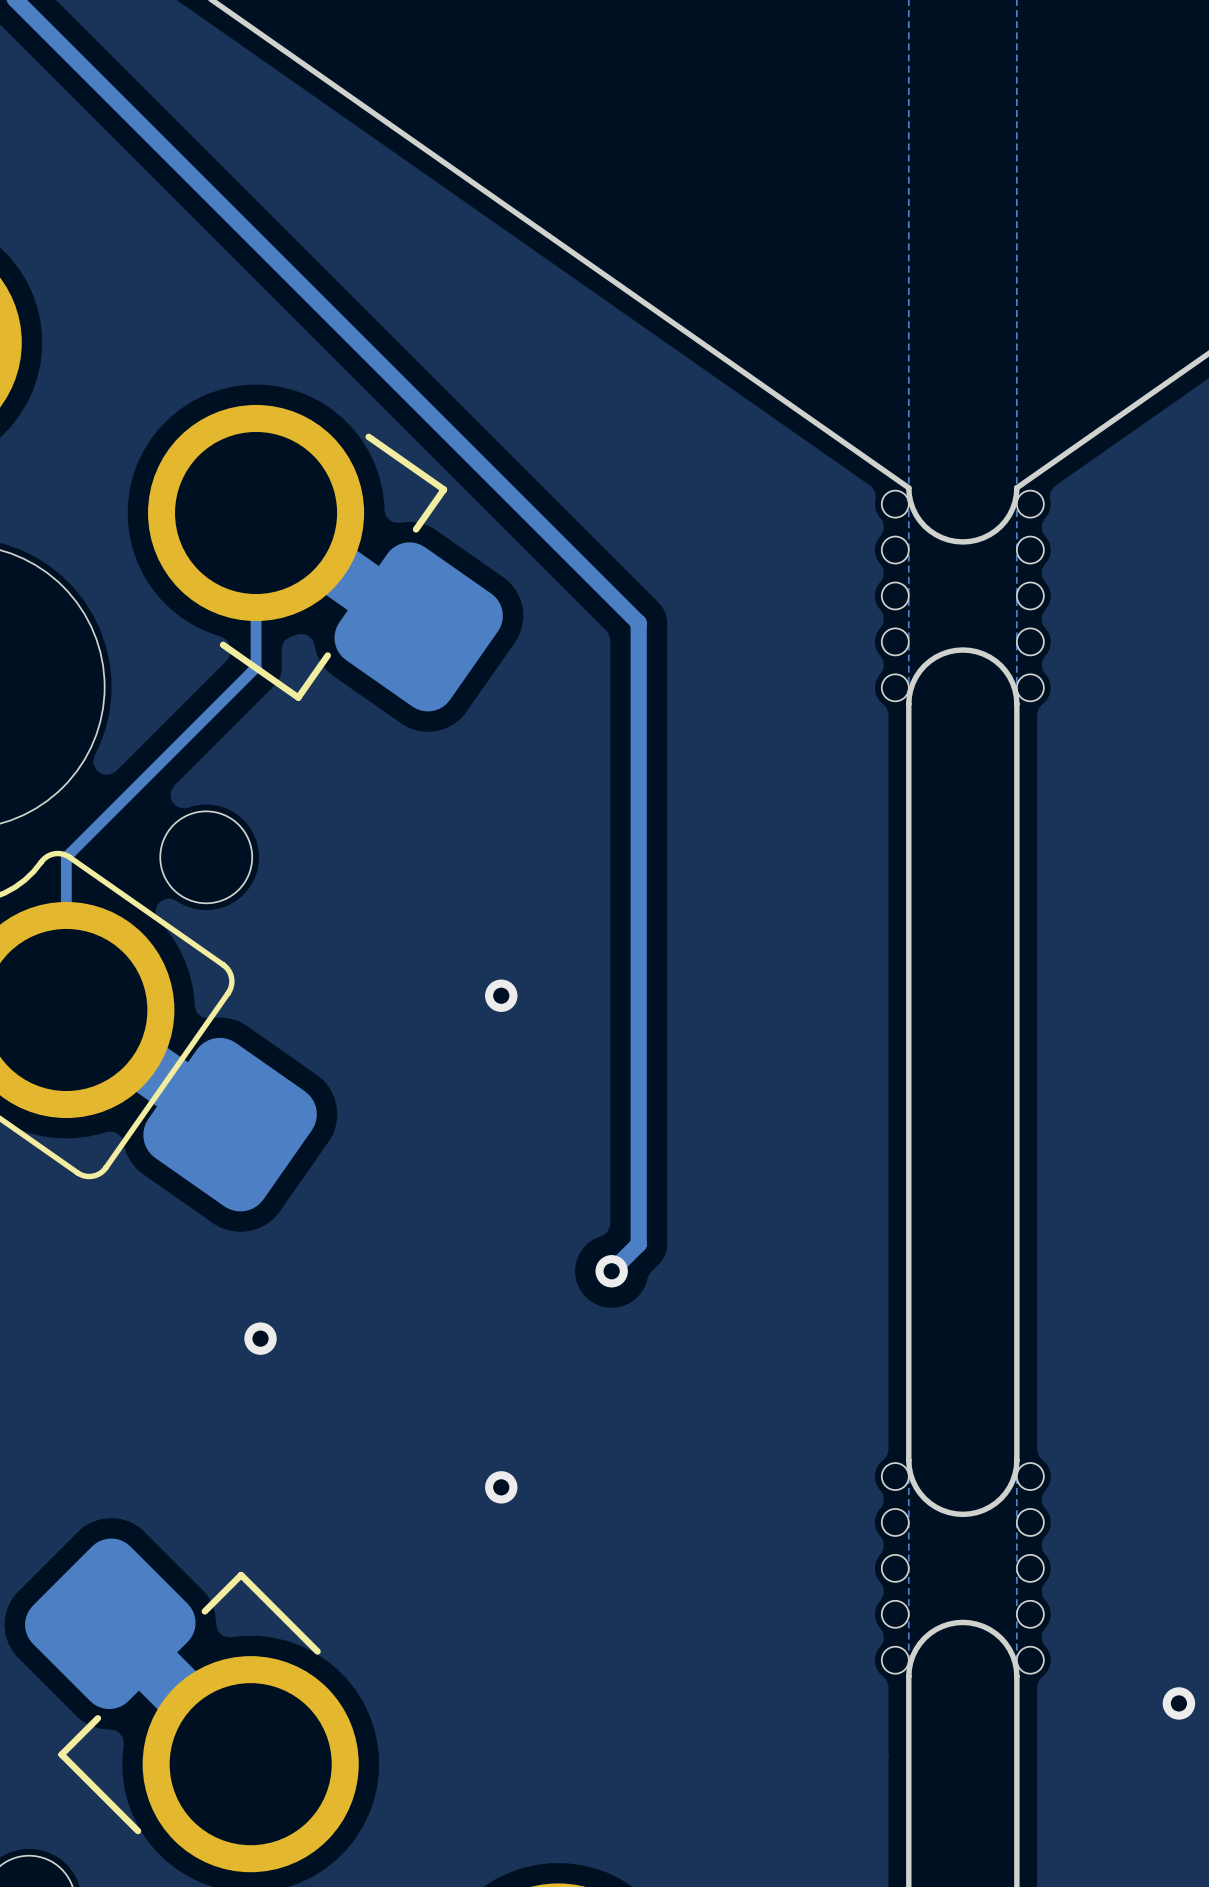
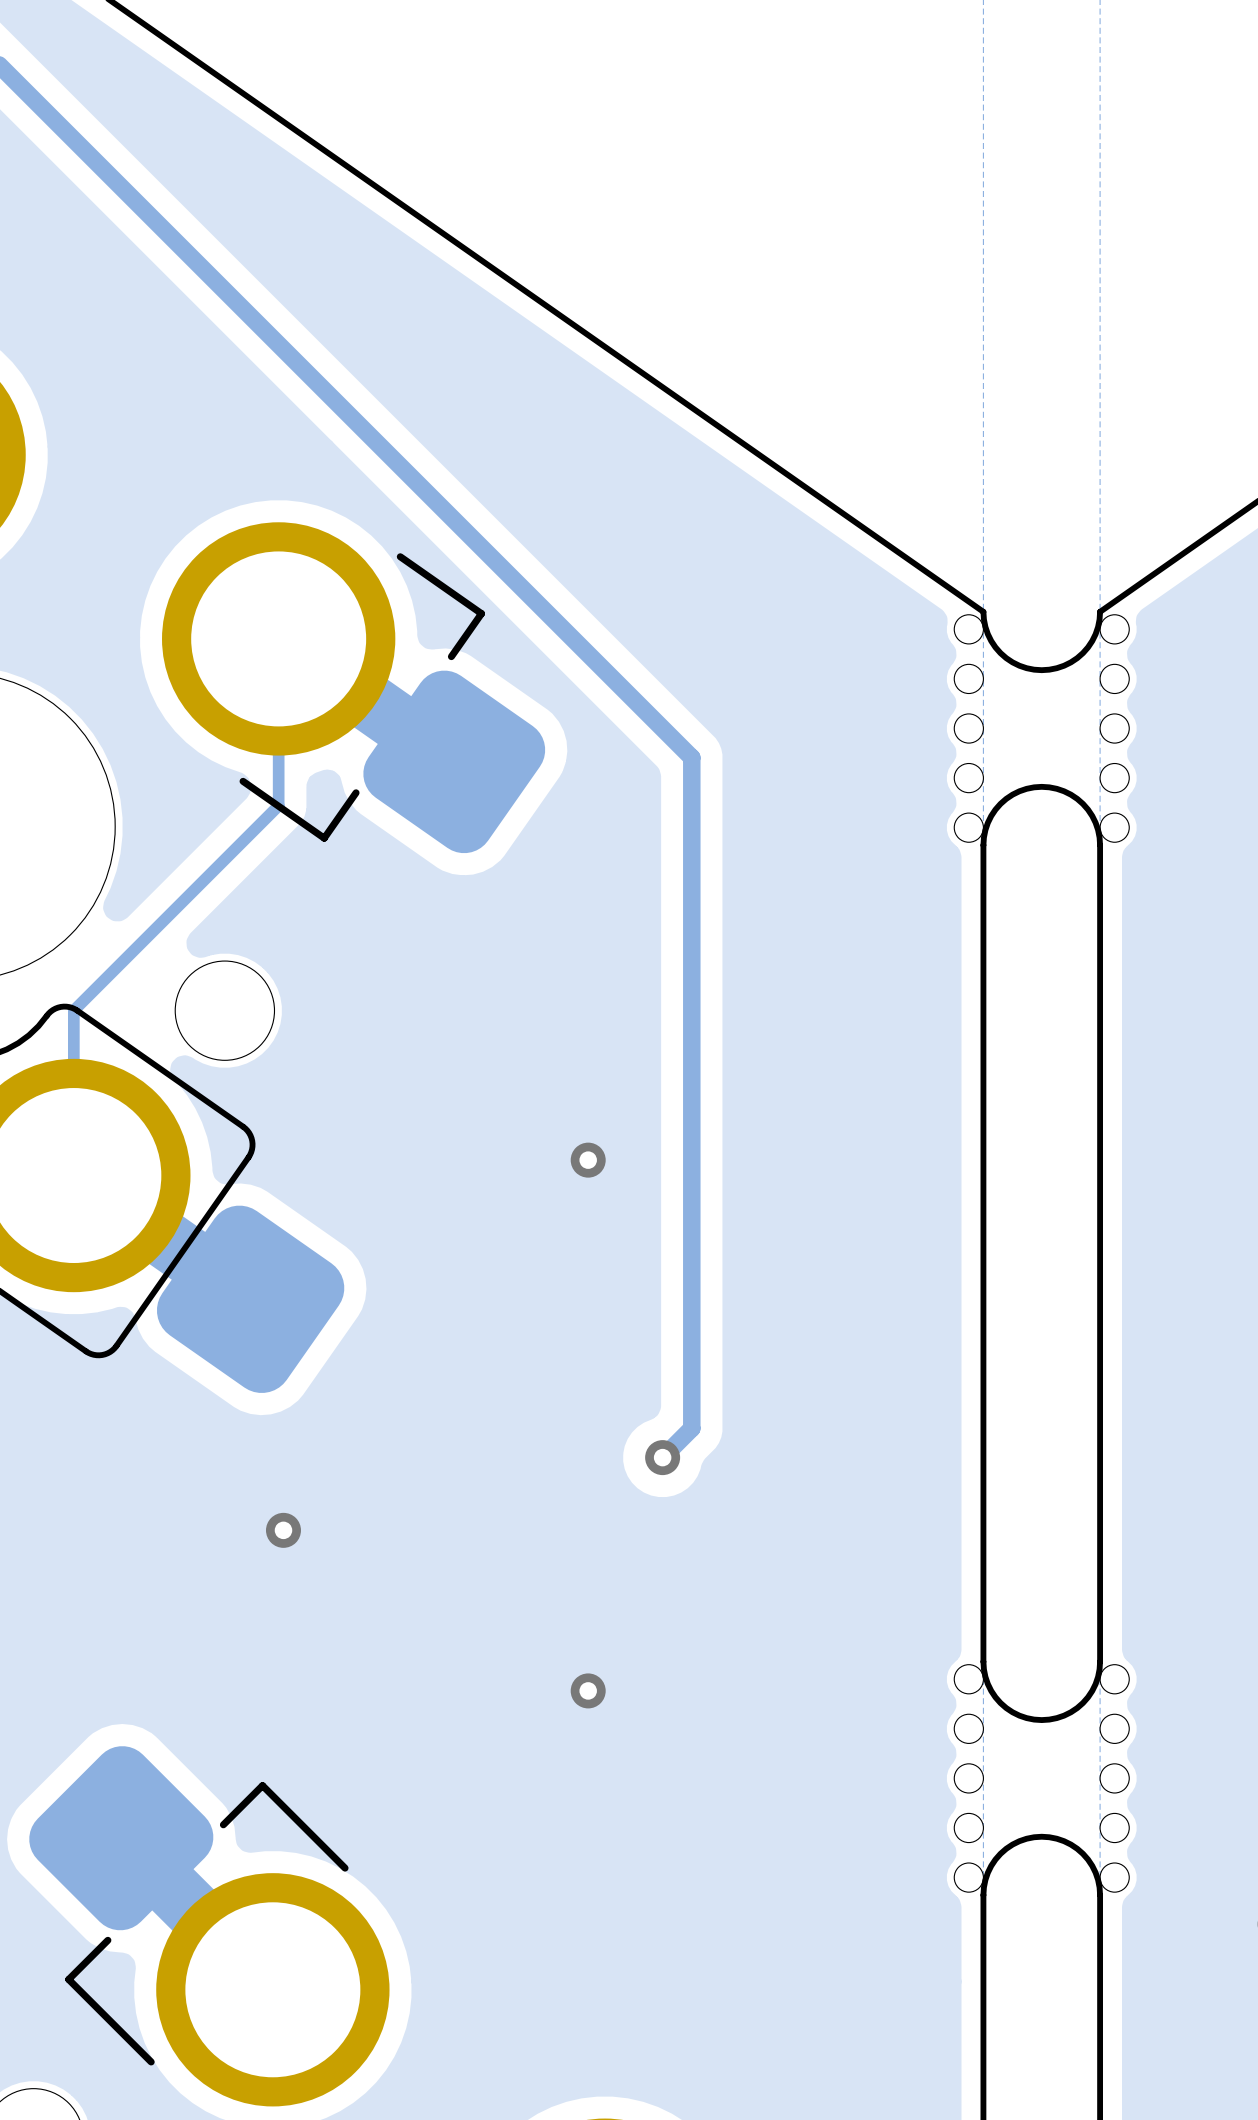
via position: (501, 995) -> (588, 1160)
via position: (501, 1487) -> (588, 1690)

